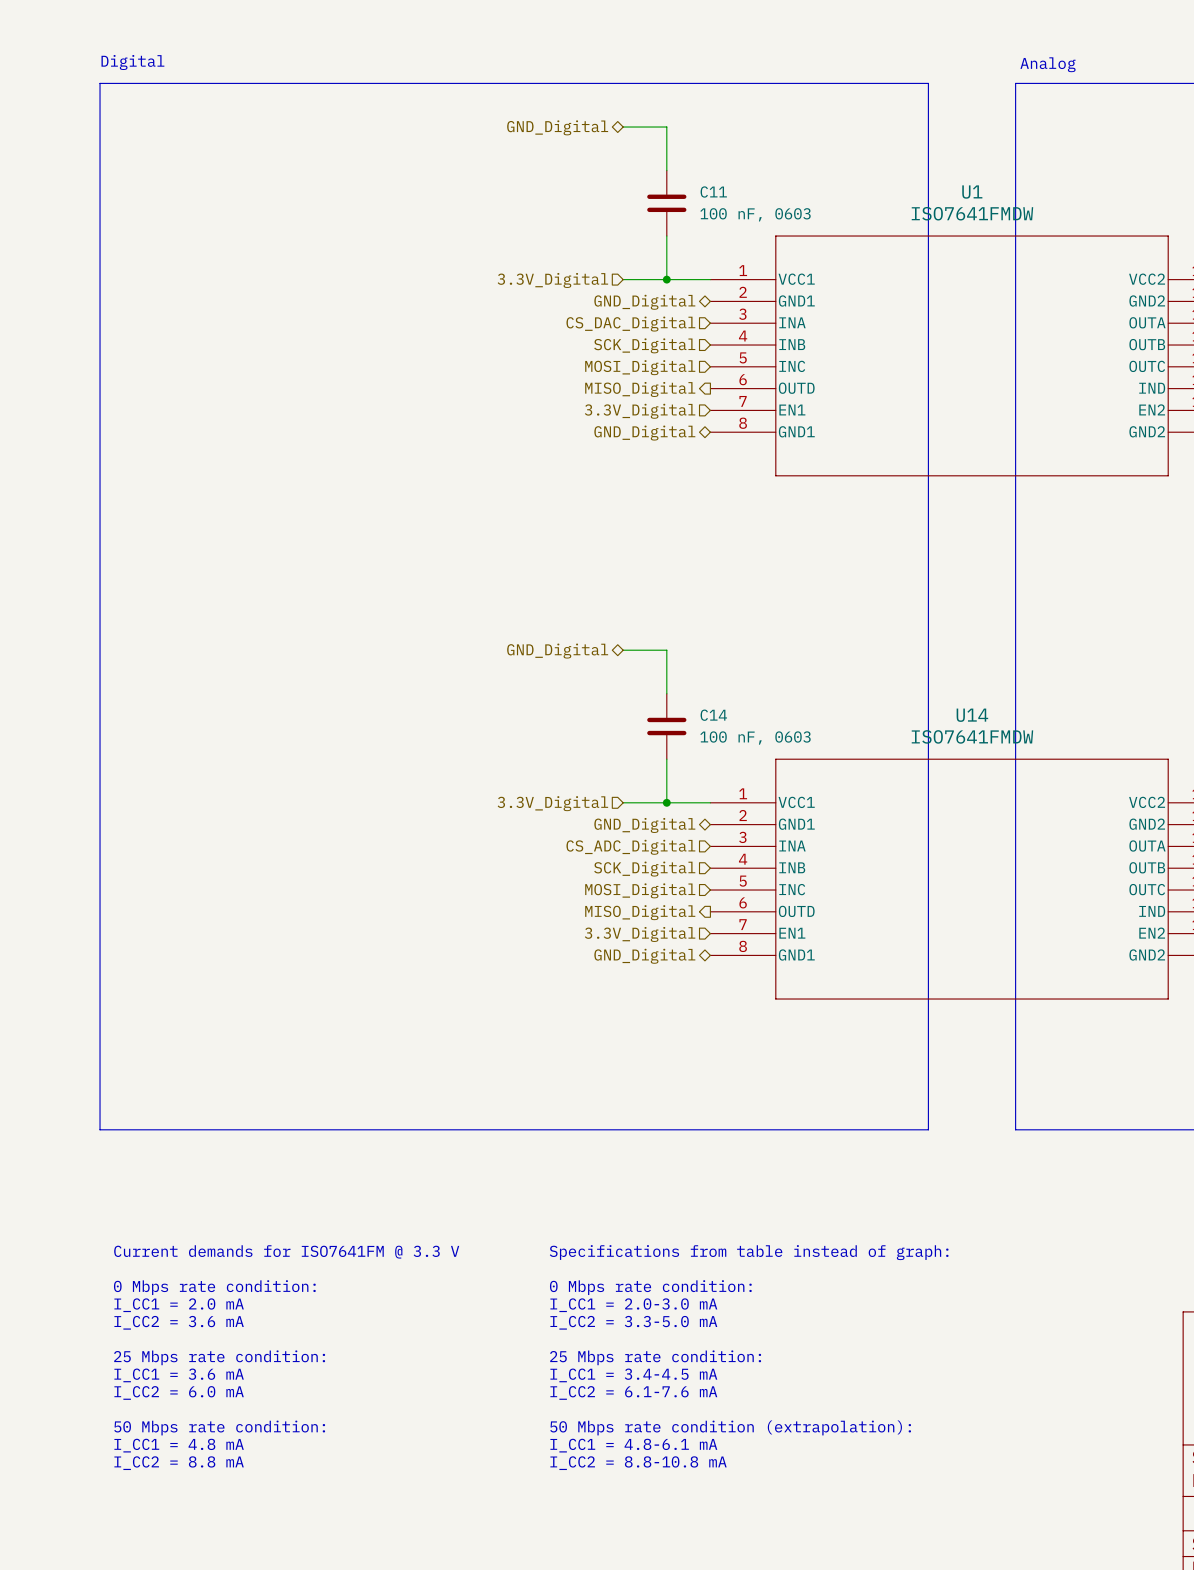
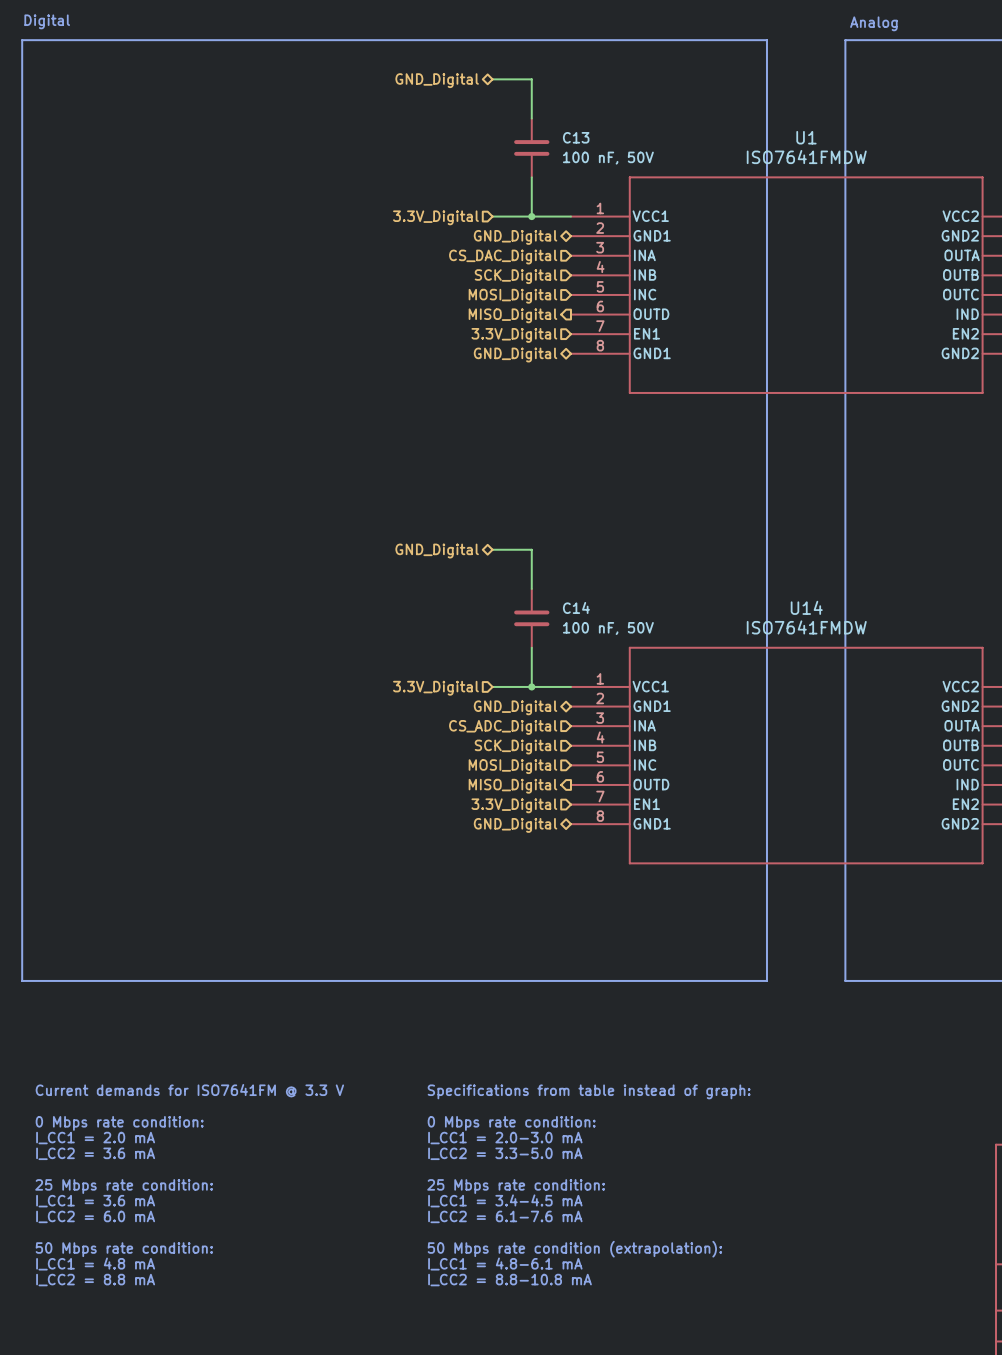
C11 name: C11 (713, 192) -> C13 (576, 137)
C11 value: 100 nF, 0603 (755, 214) -> 100 nF, 50V (608, 158)
C14 value: 100 nF, 0603 (755, 738) -> 100 nF, 50V (608, 628)

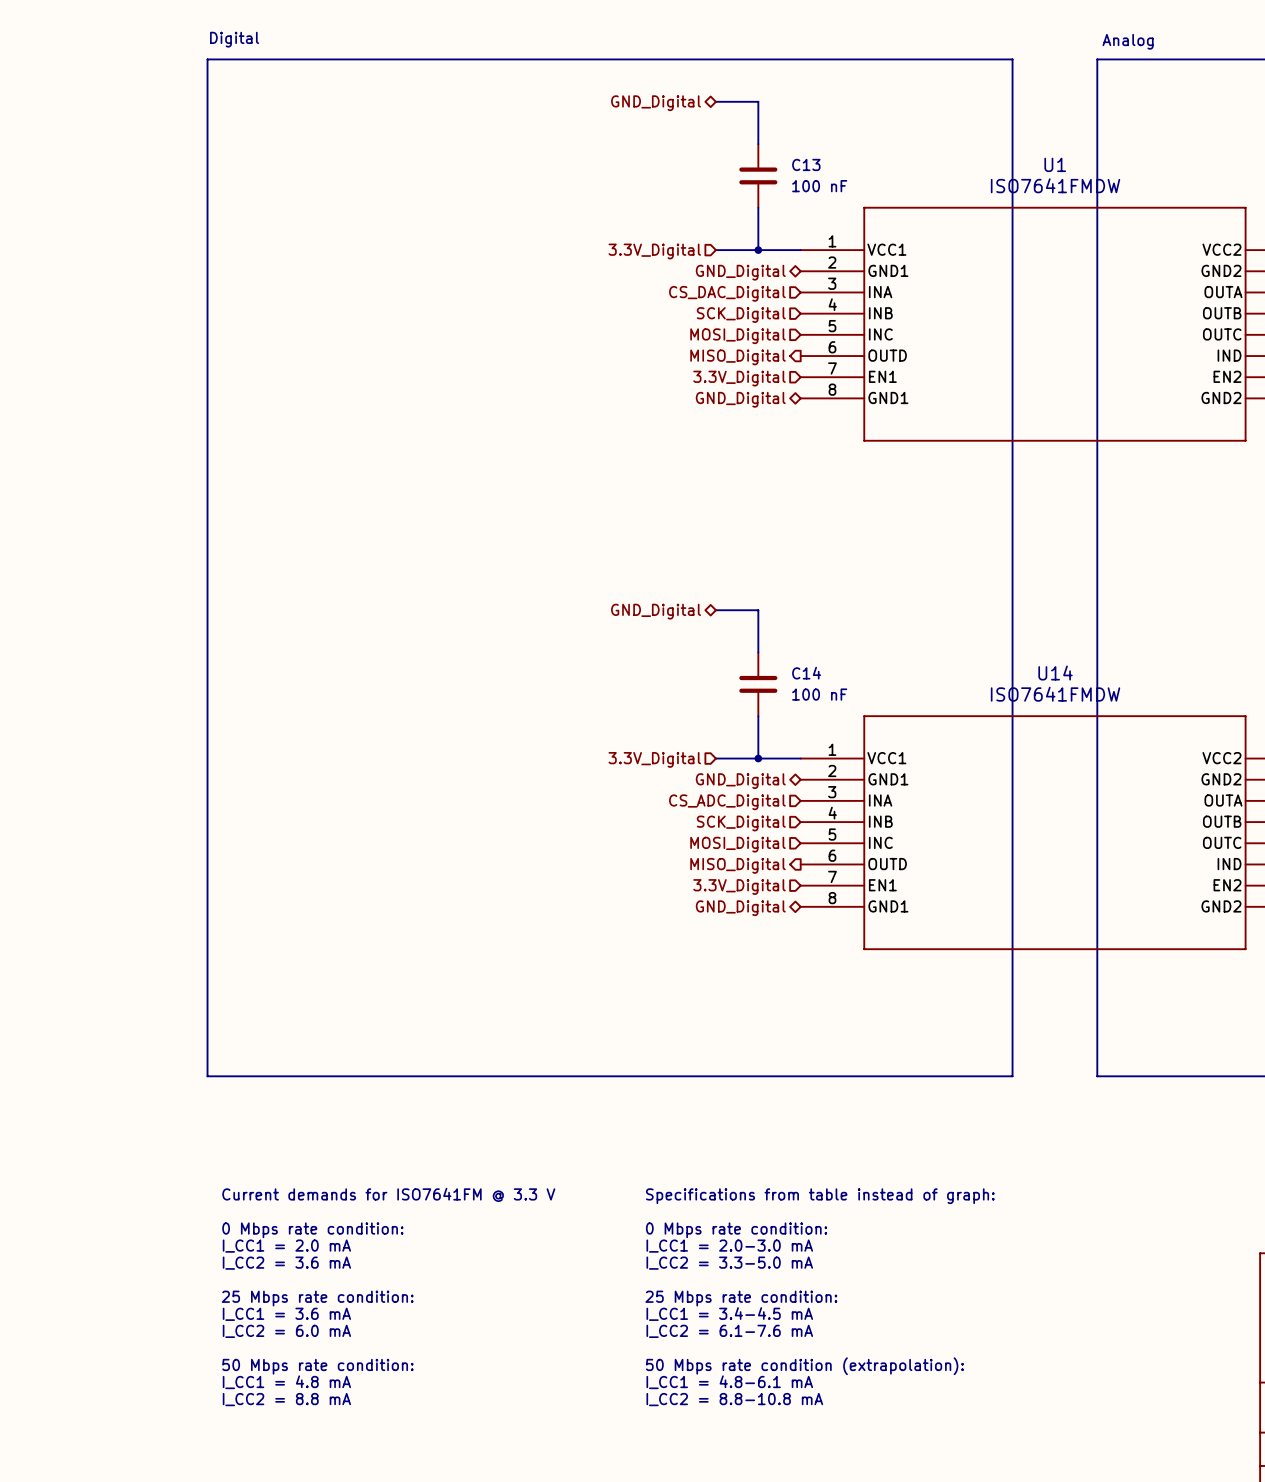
C13 value: 100 nF, 50V (608, 158) -> 100 nF (819, 186)
C14 value: 100 nF, 50V (608, 628) -> 100 nF (819, 694)

